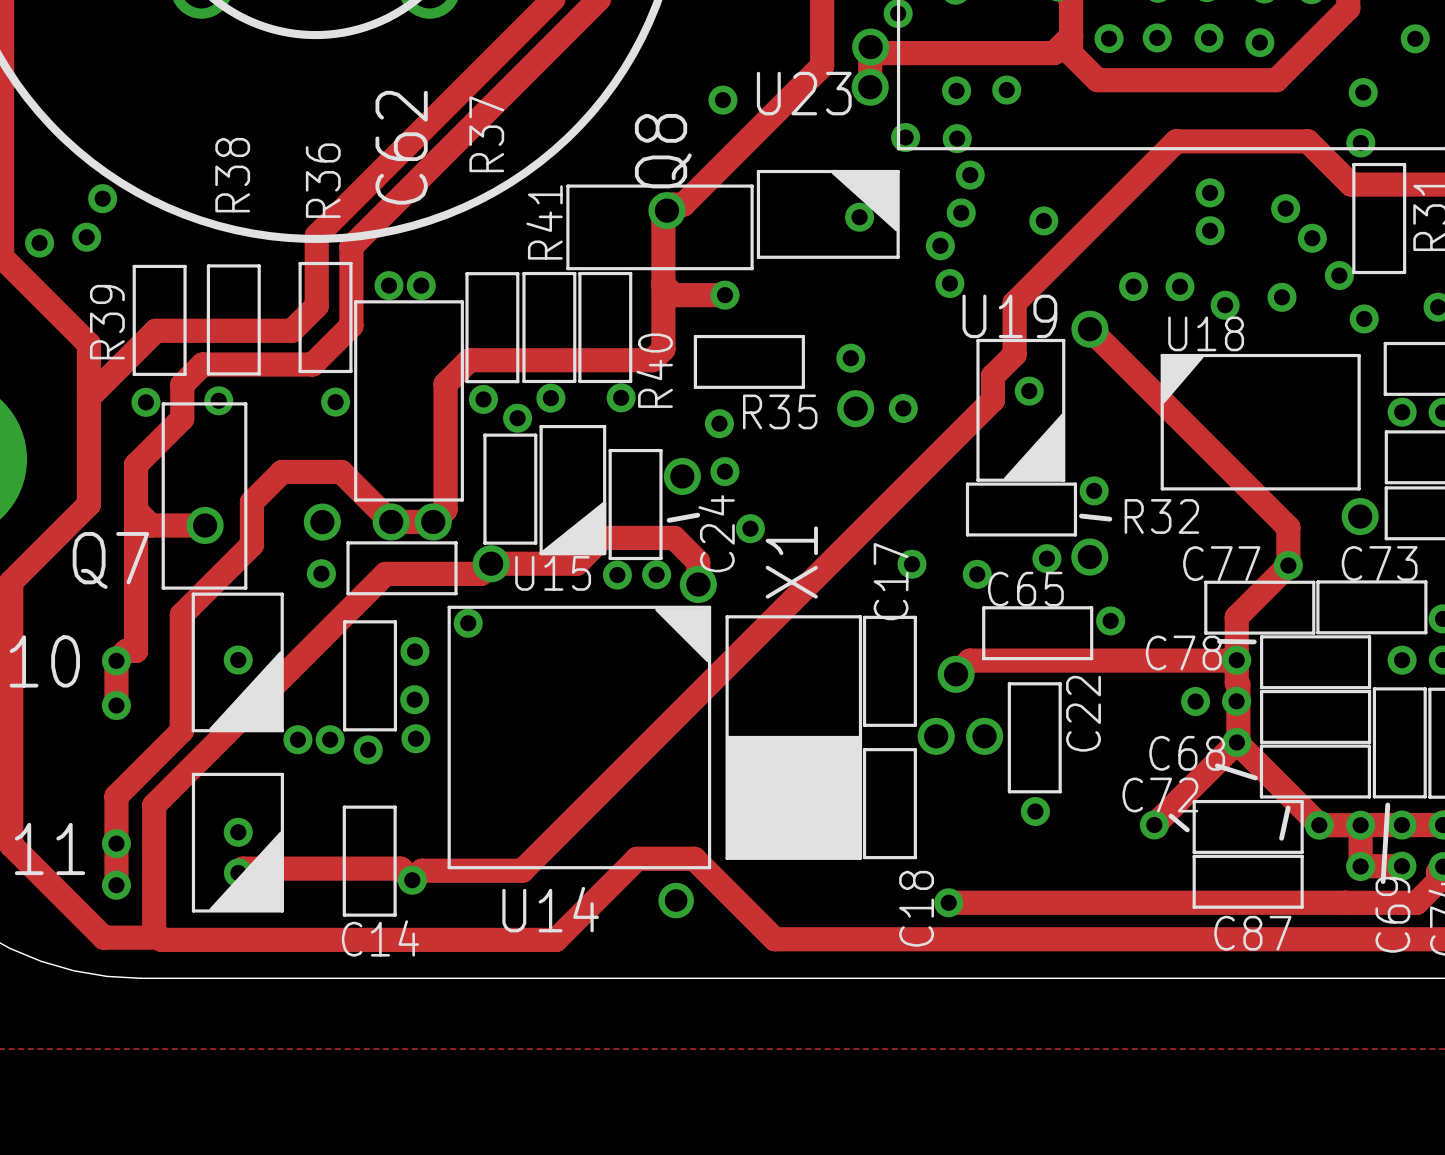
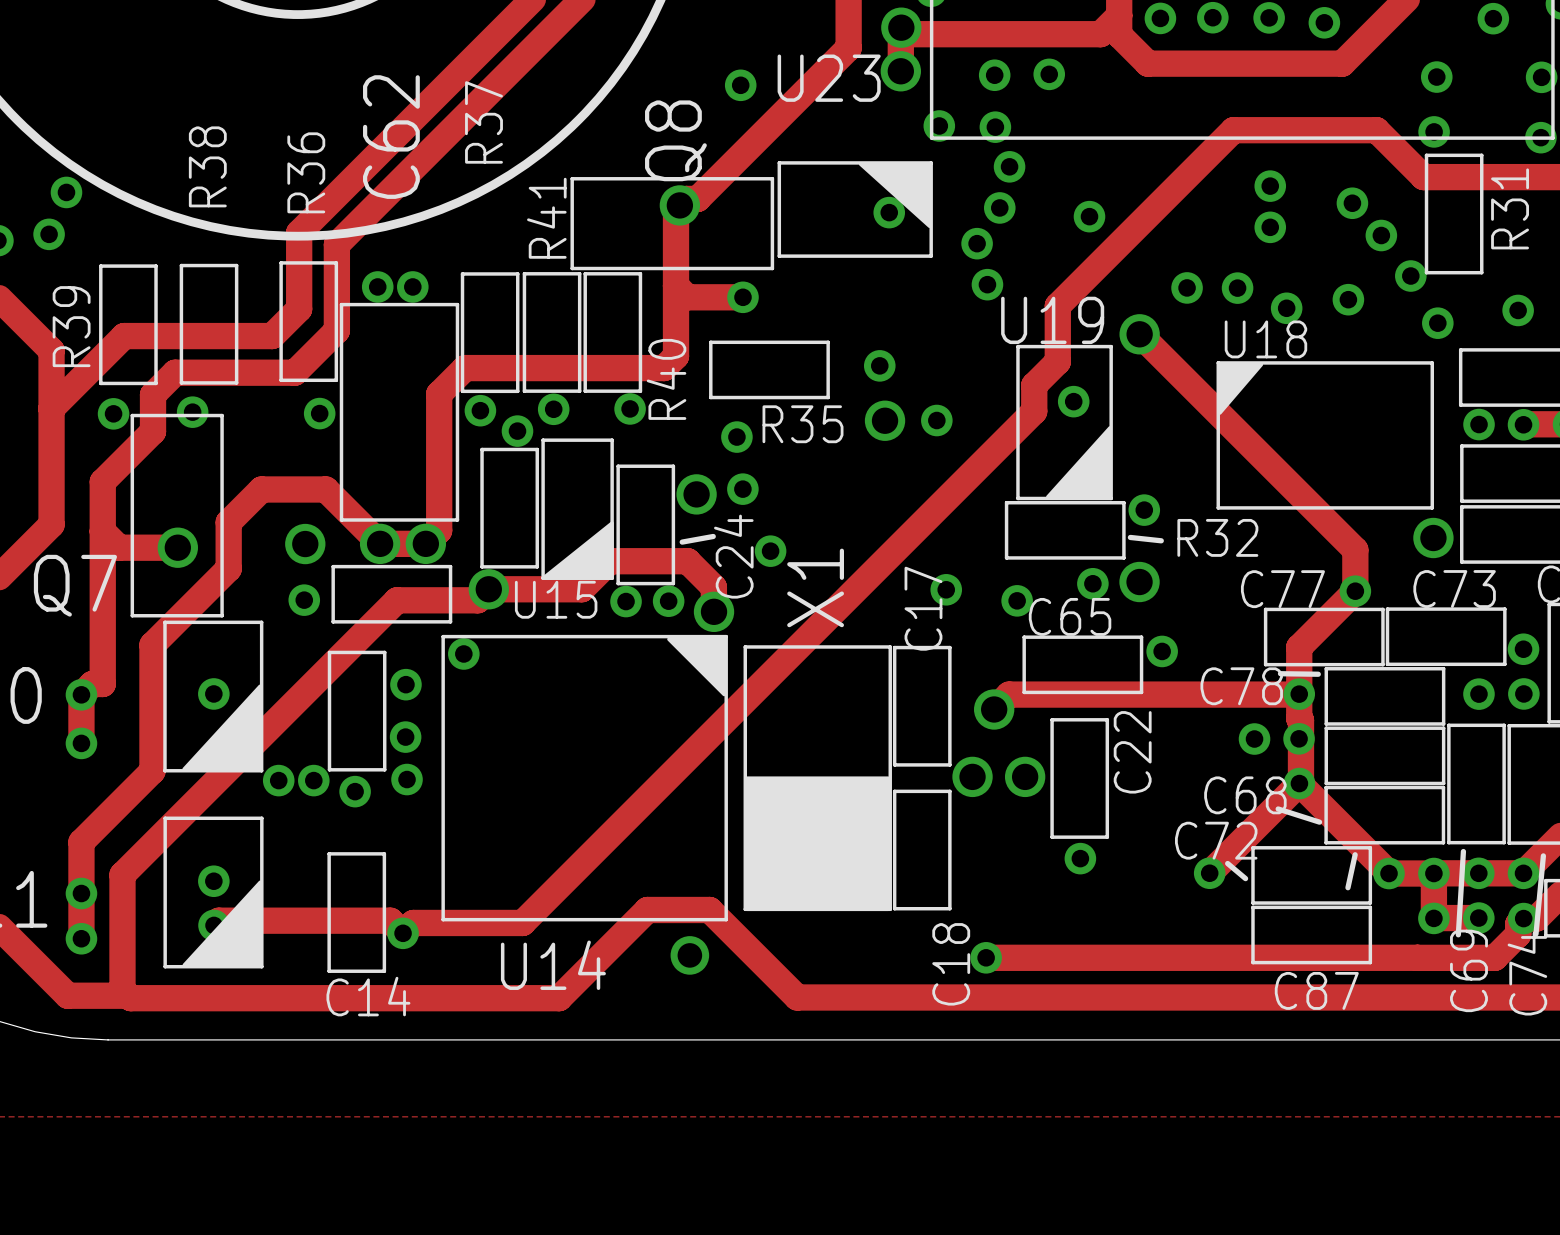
track: (406, 573) (385, 573) (154, 805) (154, 826) -> (397, 600) (122, 874)

